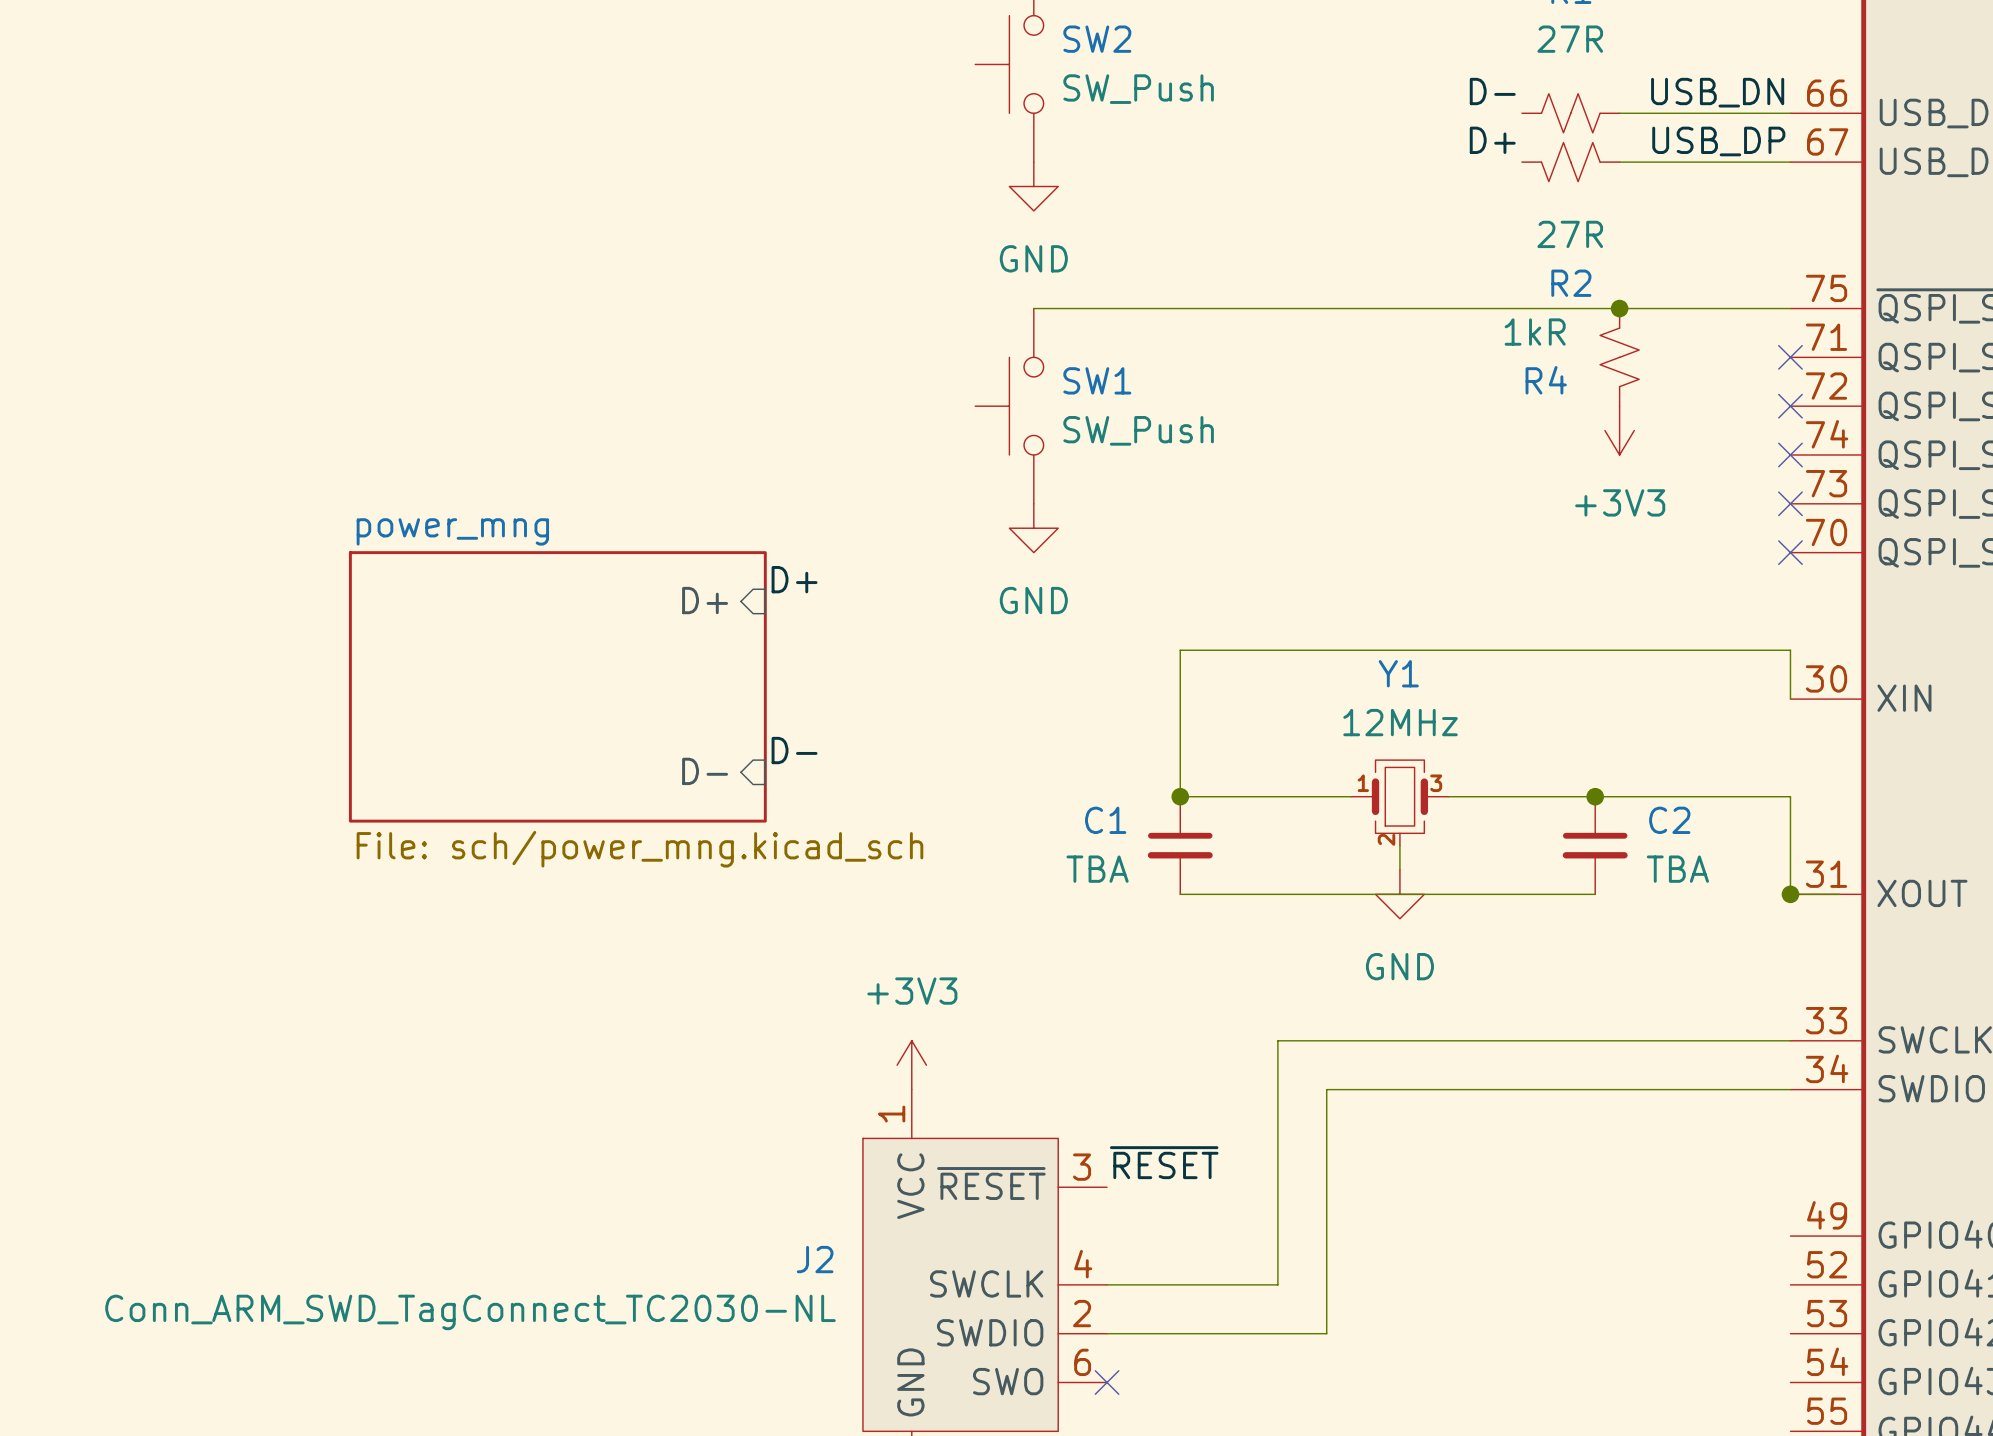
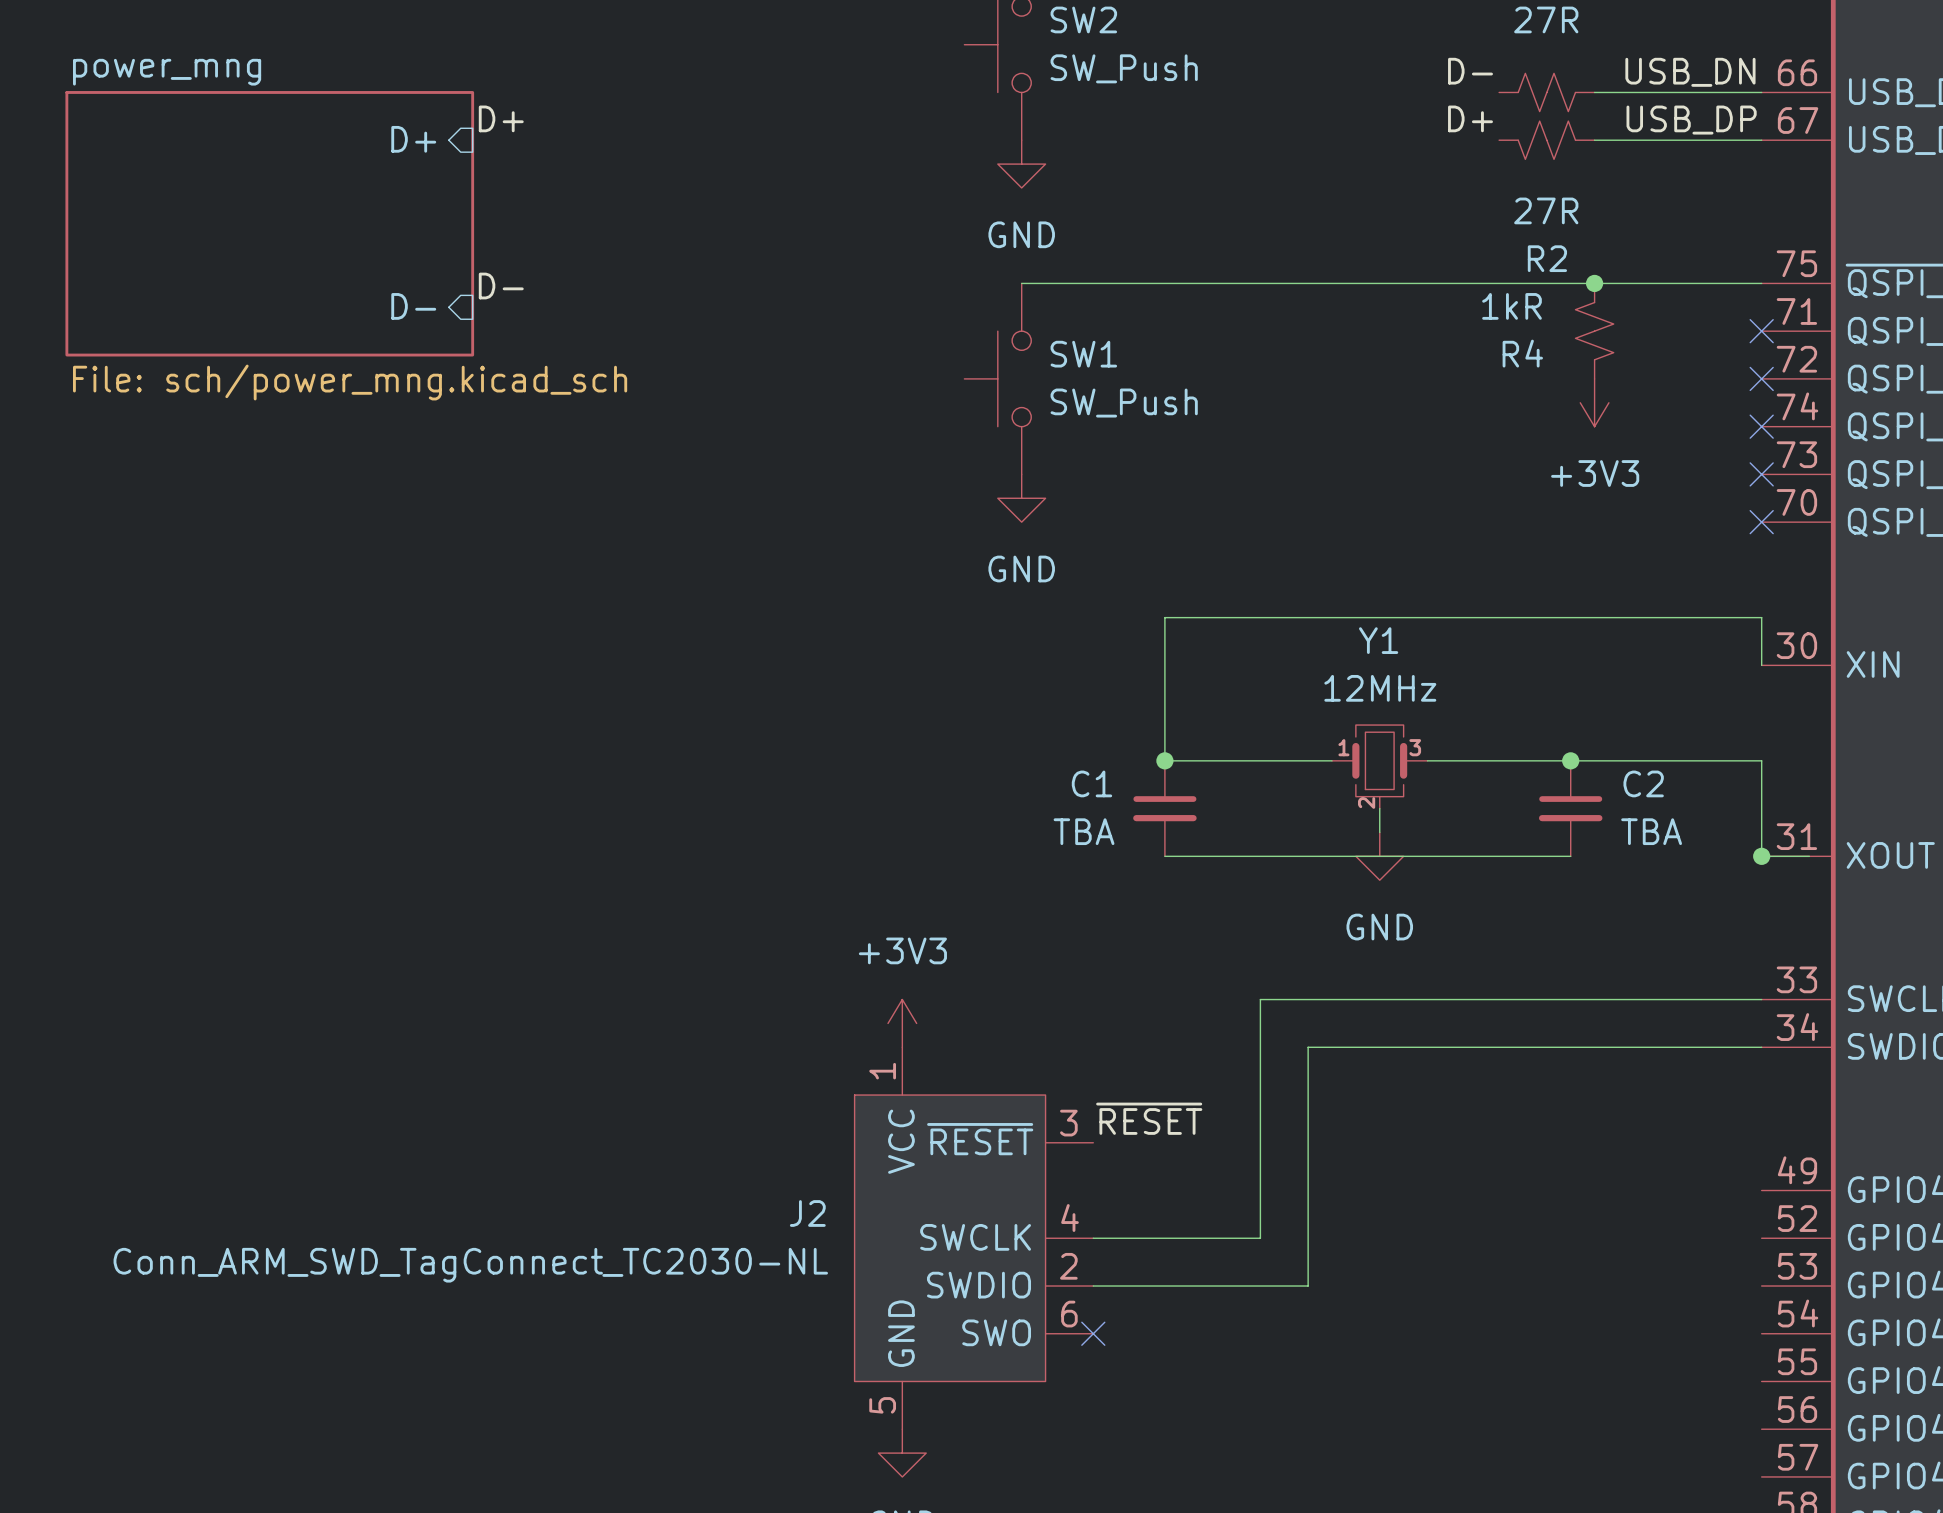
label: none -> D+ (501, 118)
sheet pin: none -> D+ (413, 139)
sheet power_mng: none -> File: sch/power_mng.kicad_sch (269, 223)
label: none -> D- (501, 286)
sheet pin: none -> D- (413, 306)
label: D+ (794, 579) -> none
sheet pin: D+ (705, 600) -> none
sheet power_mng: File: sch/power_mng.kicad_sch (557, 686) -> none
label: D- (794, 750) -> none
sheet pin: D- (705, 771) -> none

